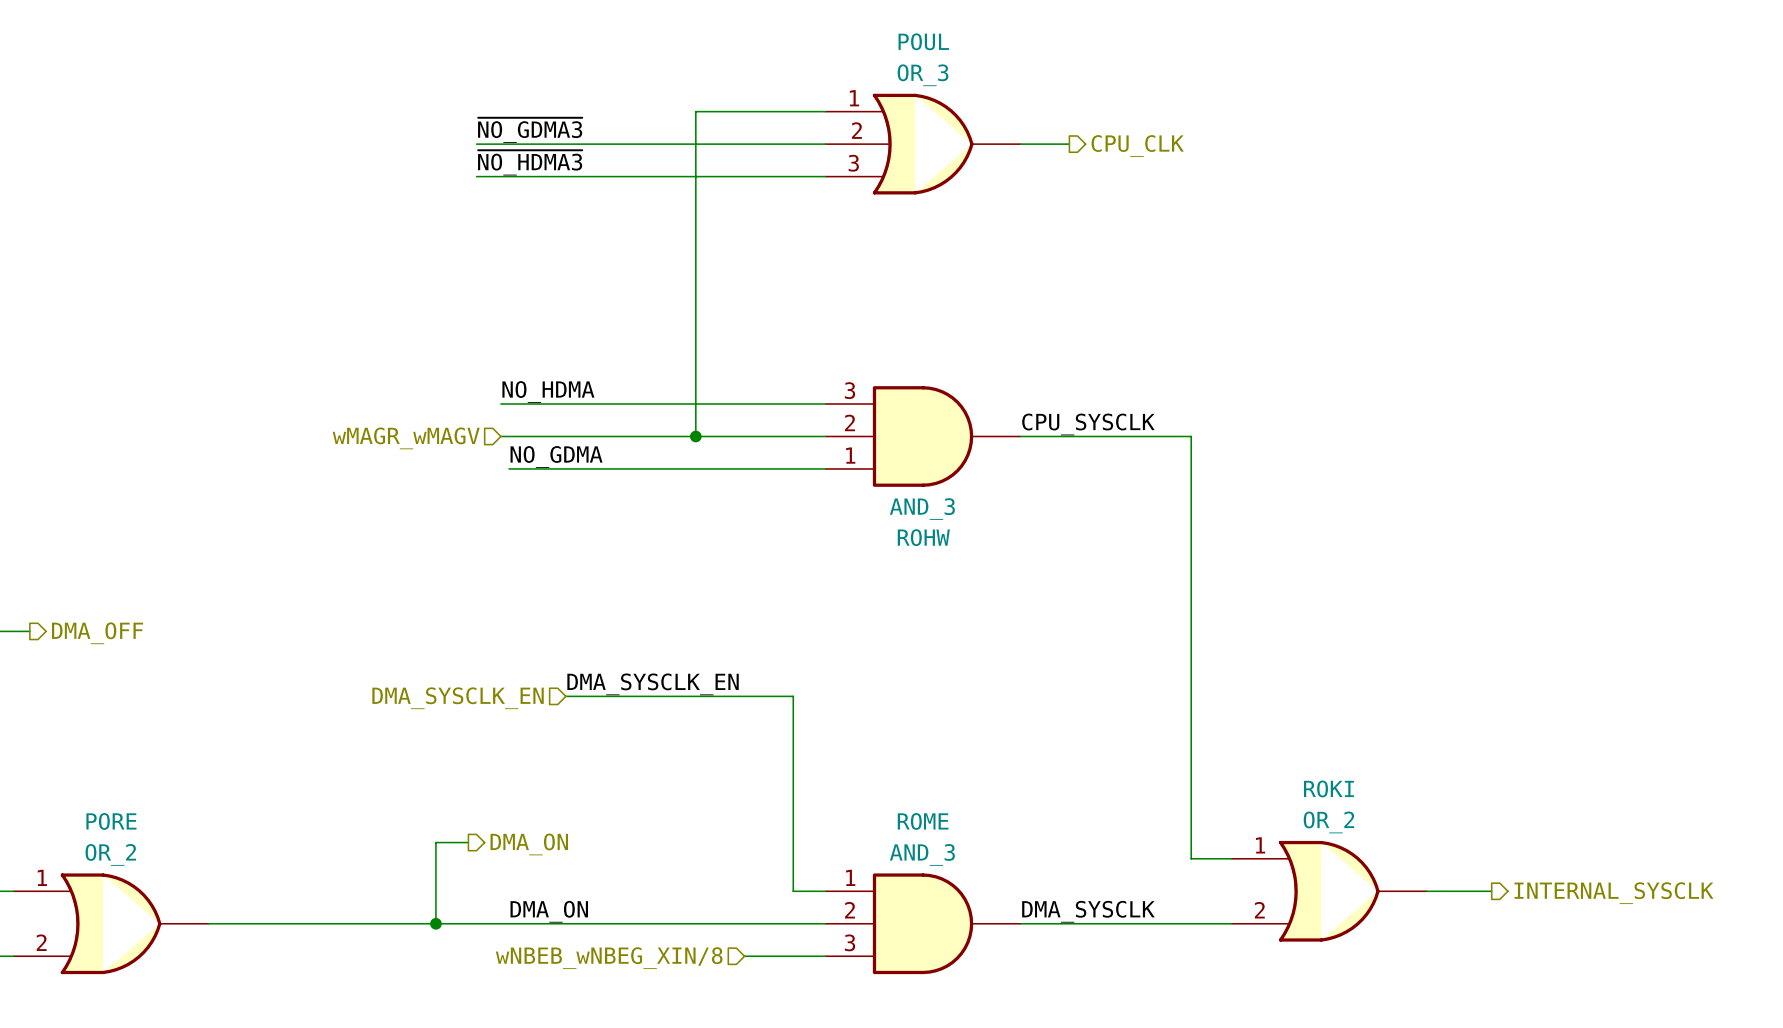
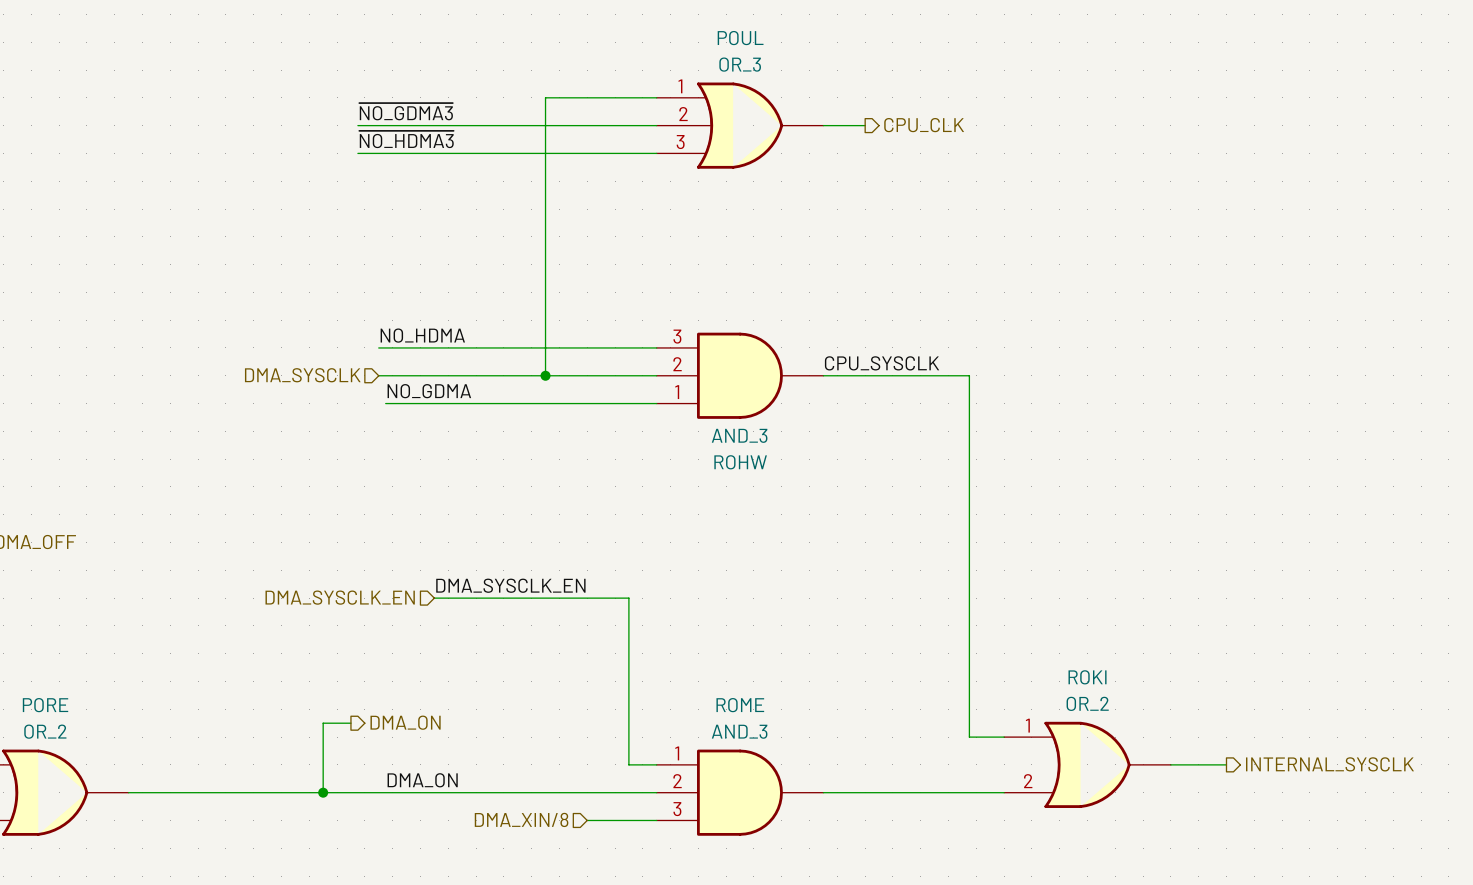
hierarchical label: wMAGR_wMAGV (406, 438) -> DMA_SYSCLK (302, 375)
label: DMA_SYSCLK (1088, 911) -> none
hierarchical label: wNBEB_wNBEG_XIN/8 (609, 958) -> DMA_XIN/8 (521, 819)

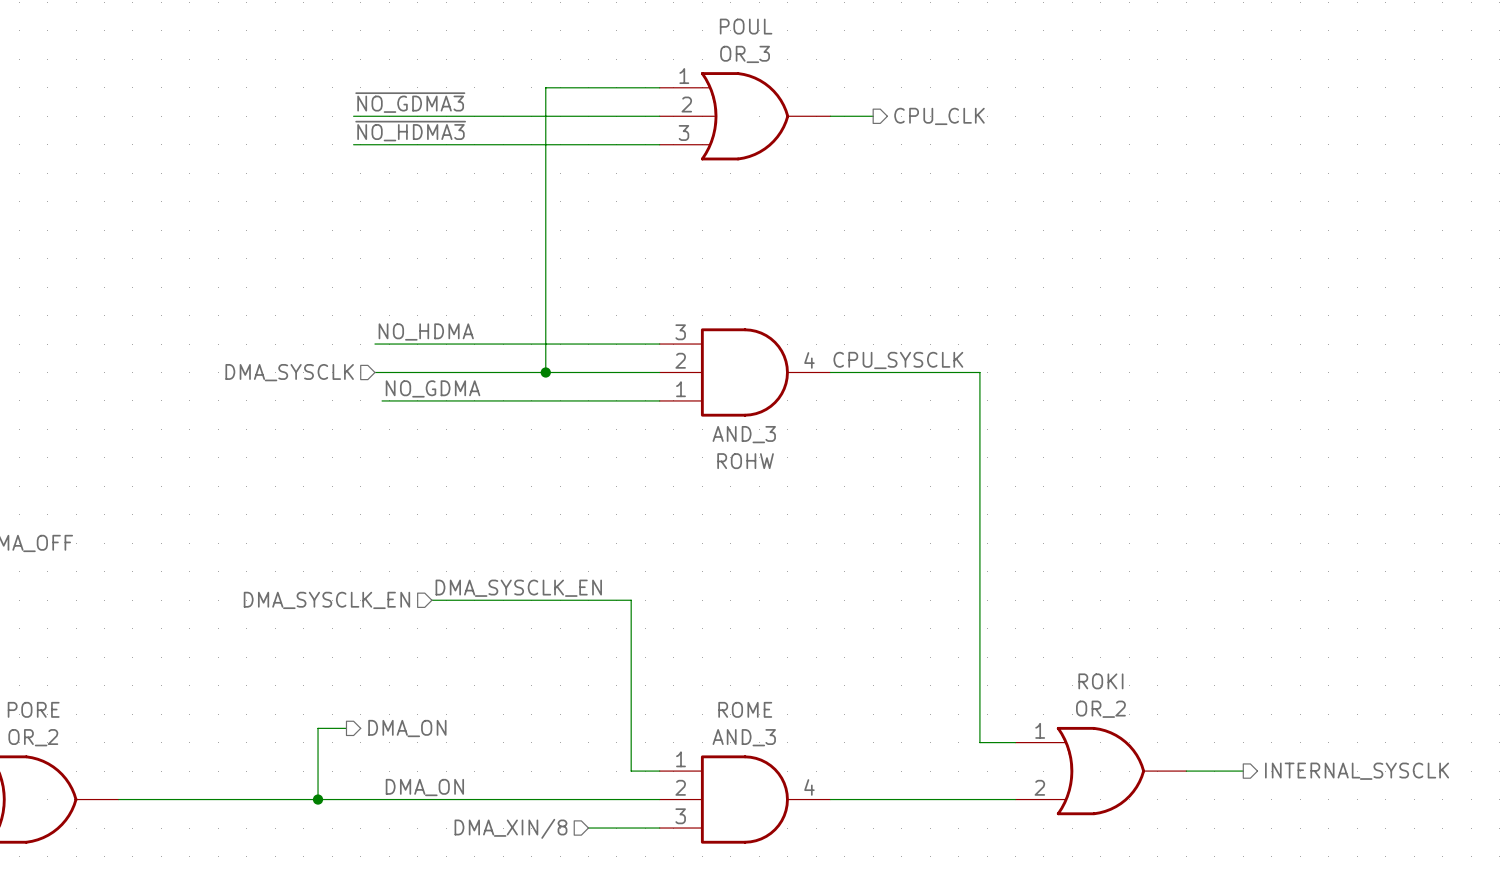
ROHW pin number: none -> 4 (809, 360)
ROME pin number: none -> 4 (809, 787)

